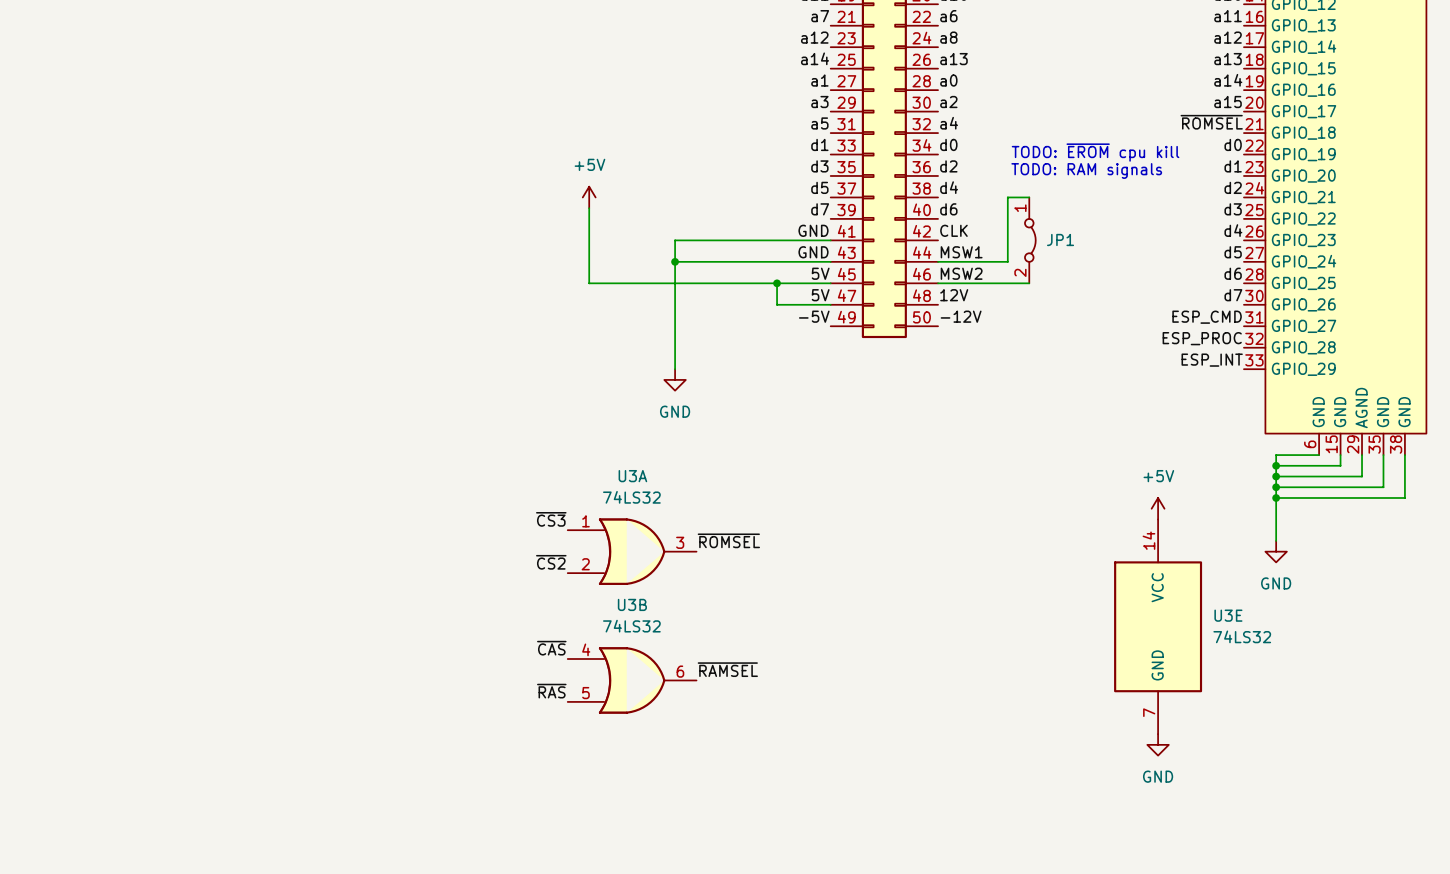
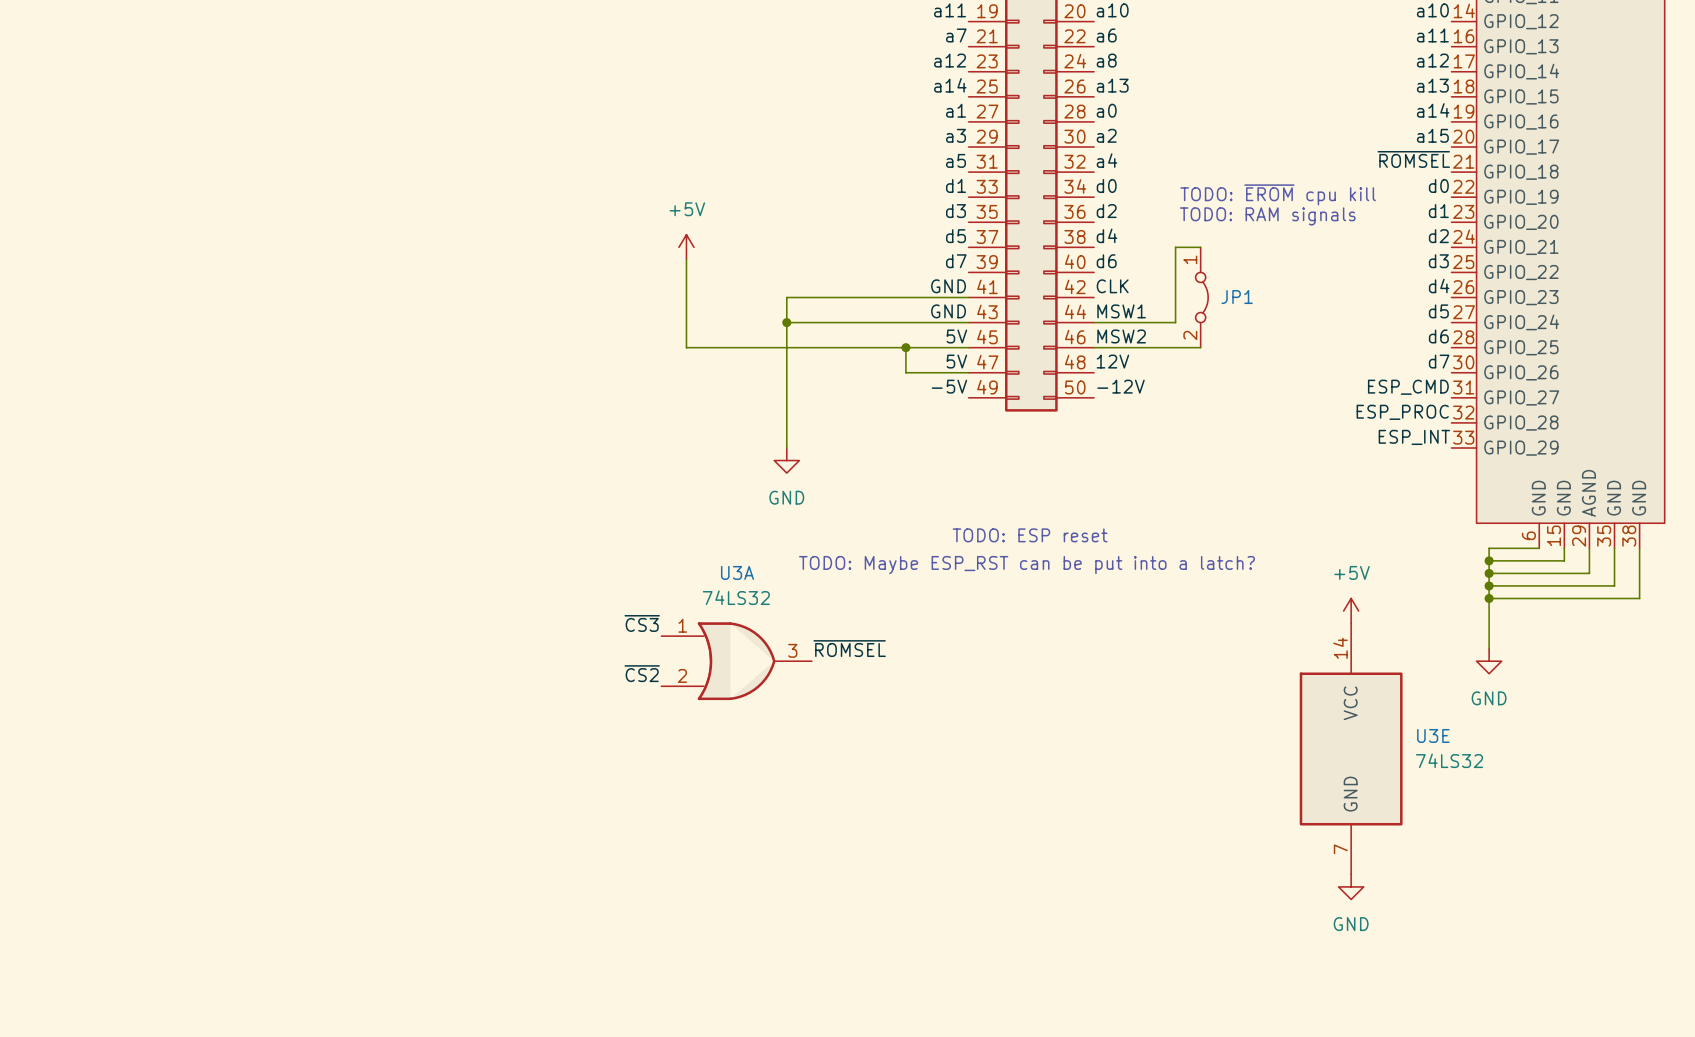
text: none -> TODO: ESP reset (1030, 535)
text: none -> TODO: Maybe ESP_RST can be put into a latch? (1026, 565)
label: ~{CAS} (551, 648) -> none
label: ~{RAMSEL} (727, 669) -> none
U3B: 74LS32 (632, 680) -> none
label: ~{RAS} (551, 691) -> none

